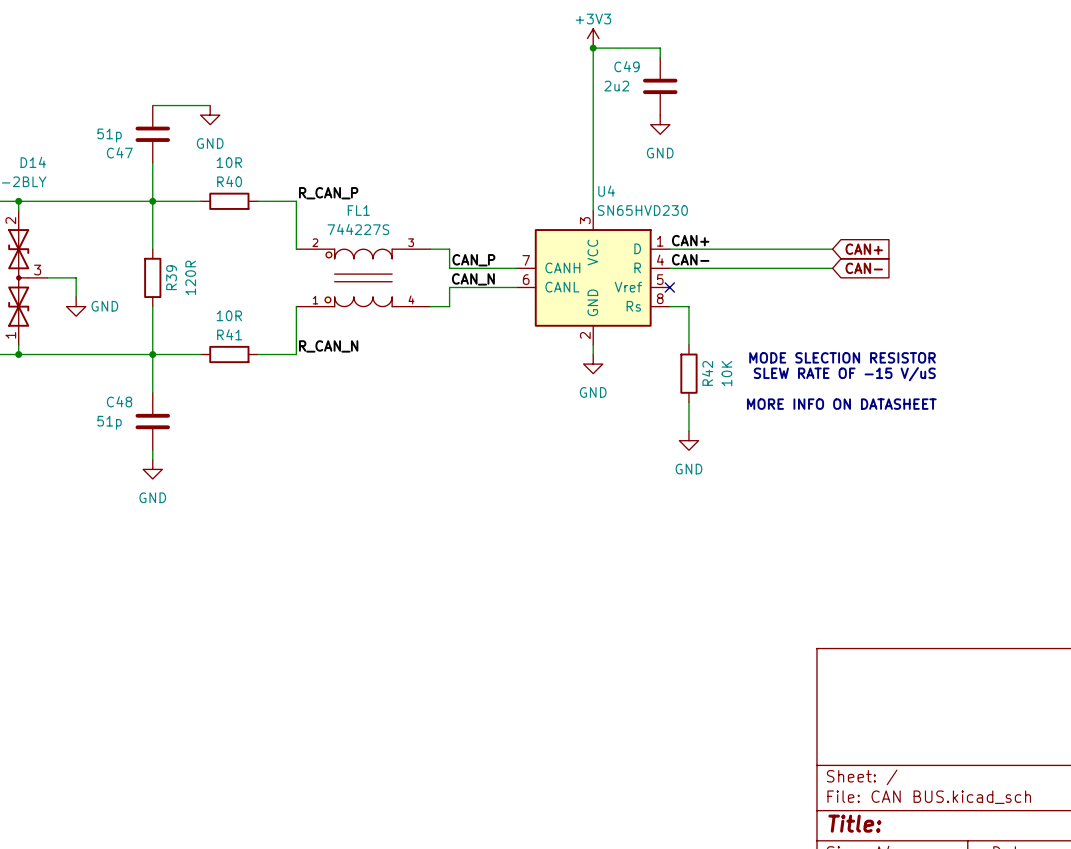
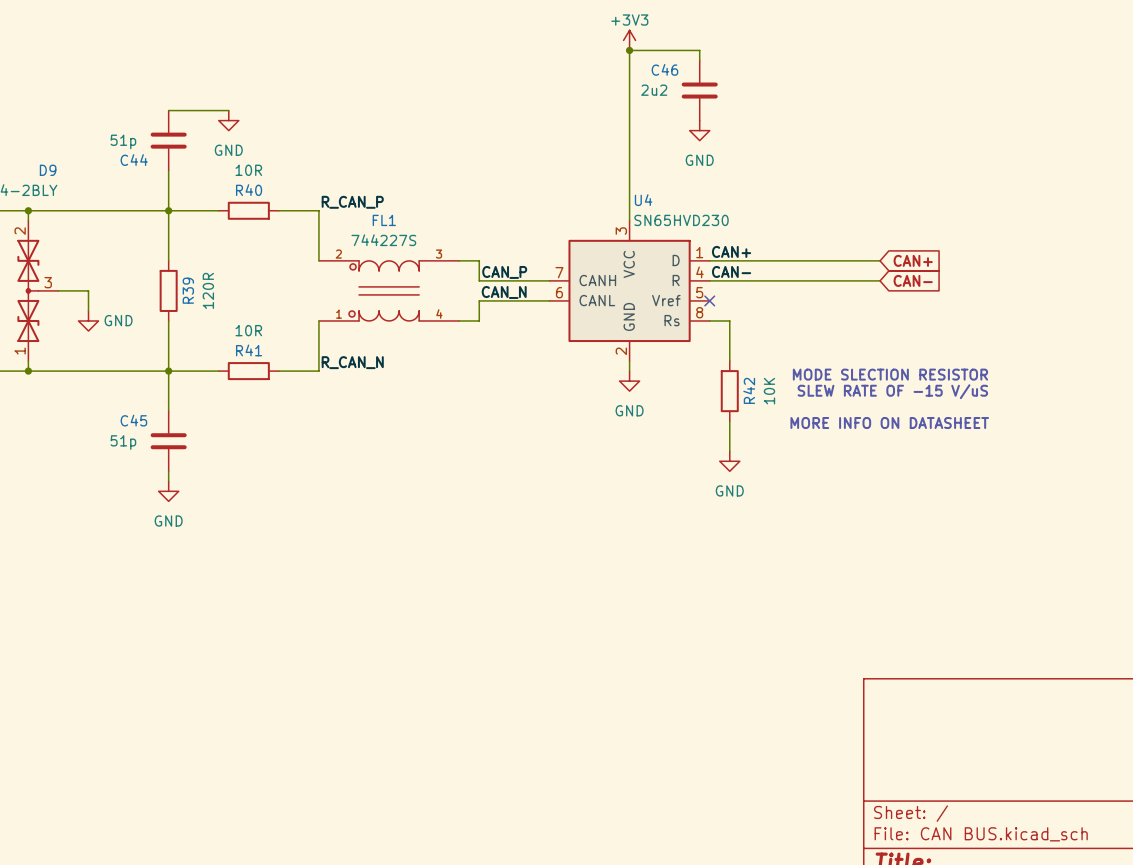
C49 name: C49 (627, 66) -> C46 (664, 69)
C47 name: C47 (119, 152) -> C44 (134, 160)
D14 name: D14 (33, 162) -> D9 (48, 170)
C48 name: C48 (119, 401) -> C45 (133, 420)

